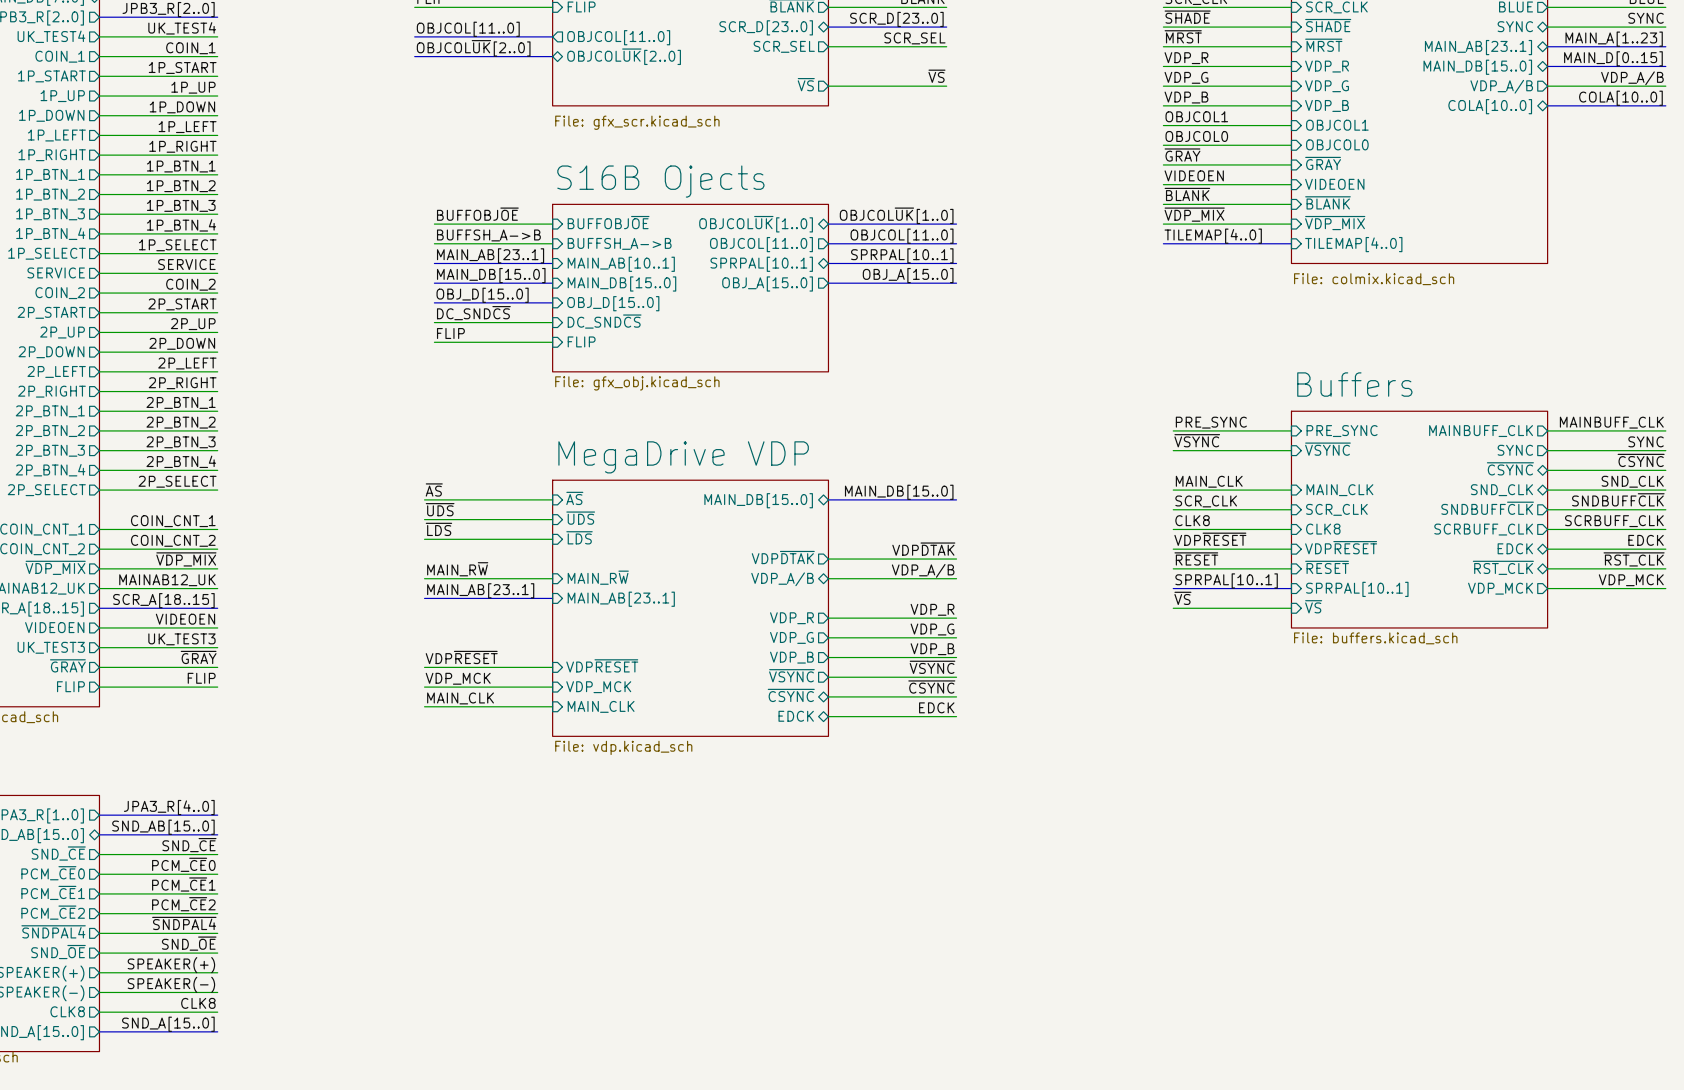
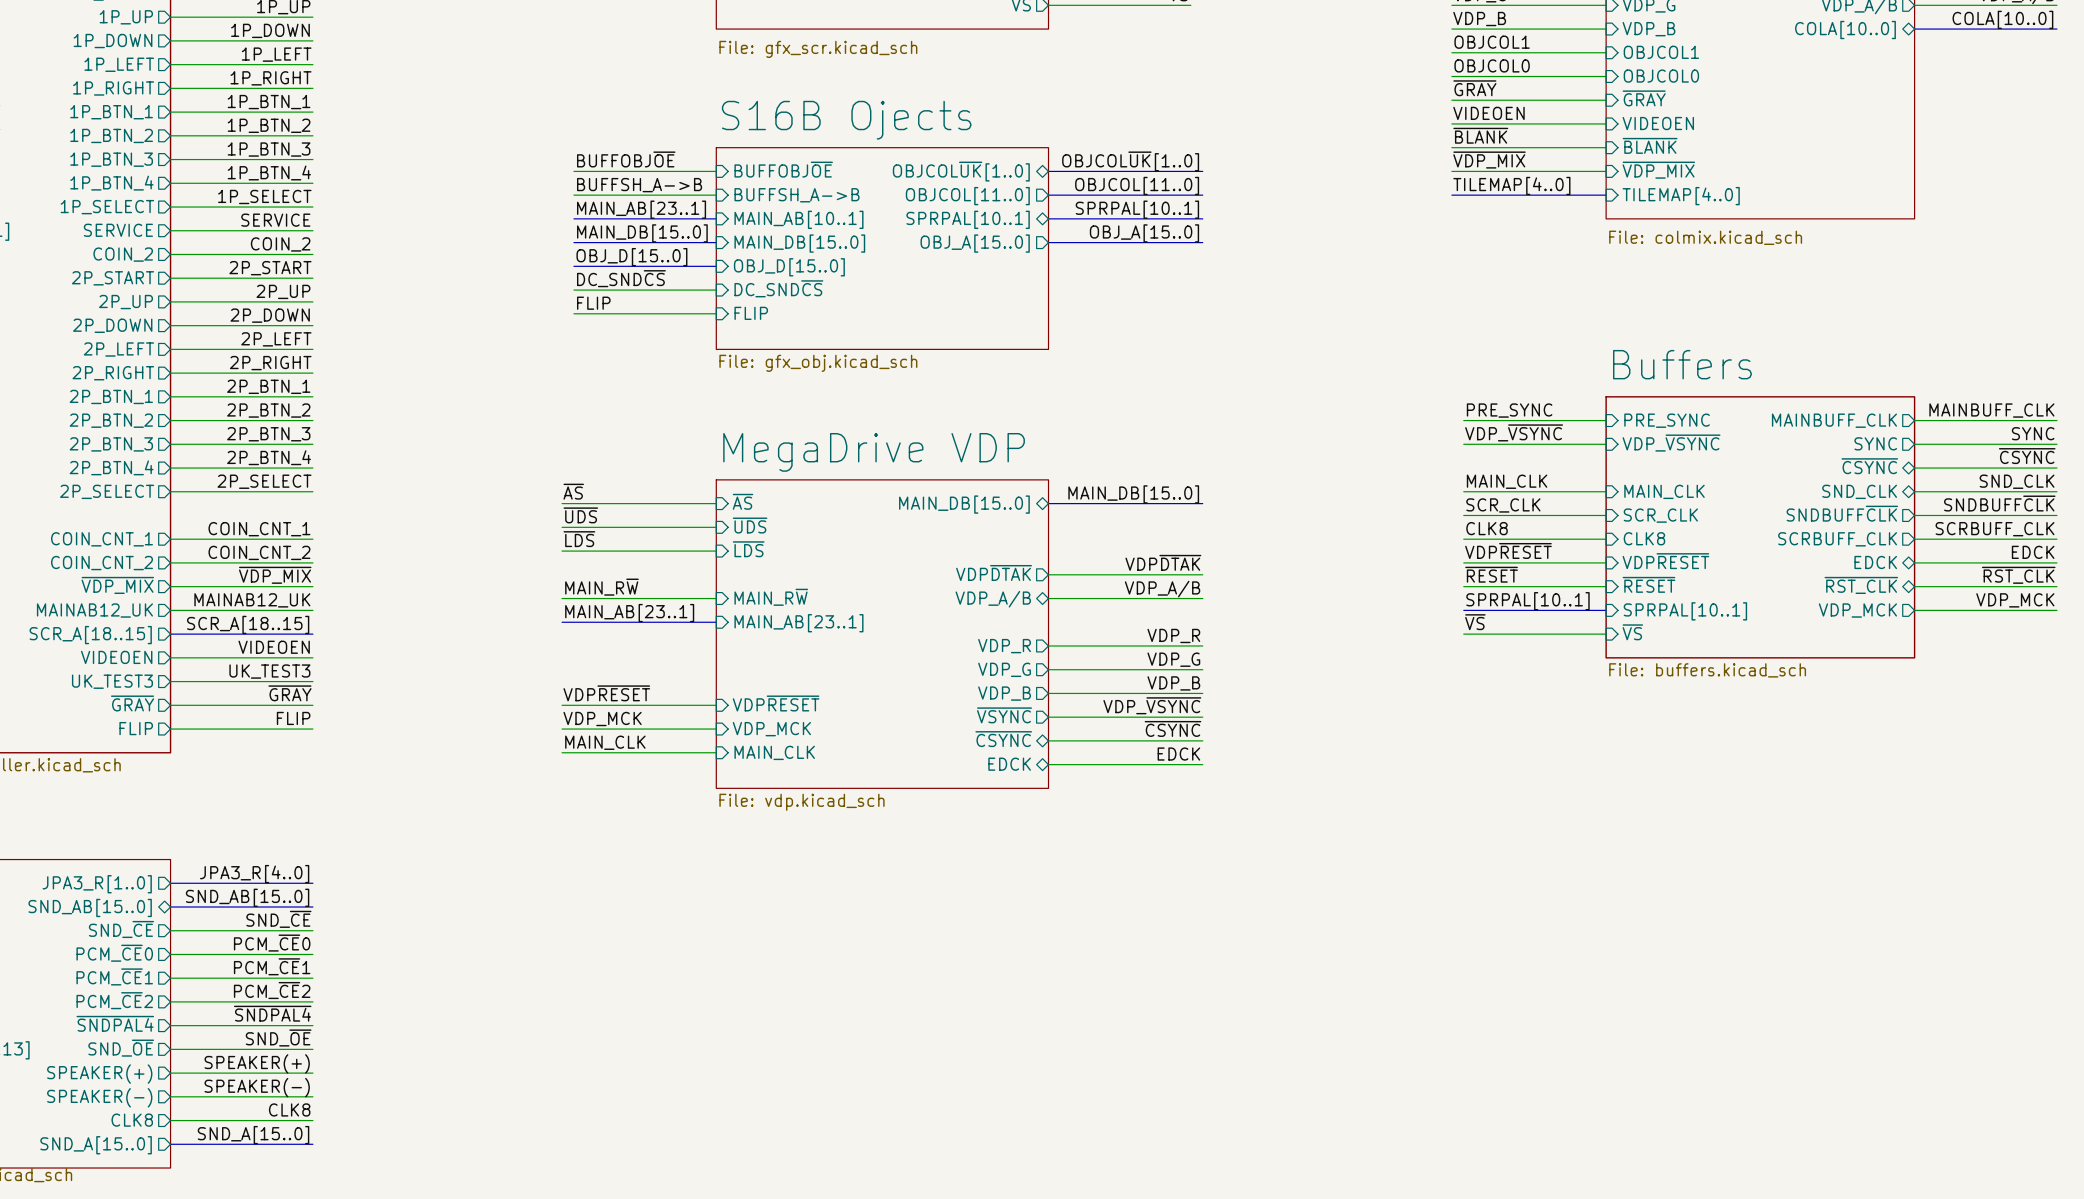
label: ~{VSYNC} (1197, 440) -> VDP_~{VSYNC} (1514, 432)
sheet pin: ~{VSYNC} (1327, 449) -> VDP_~{VSYNC} (1671, 443)
label: ~{VSYNC} (932, 667) -> VDP_~{VSYNC} (1152, 705)

